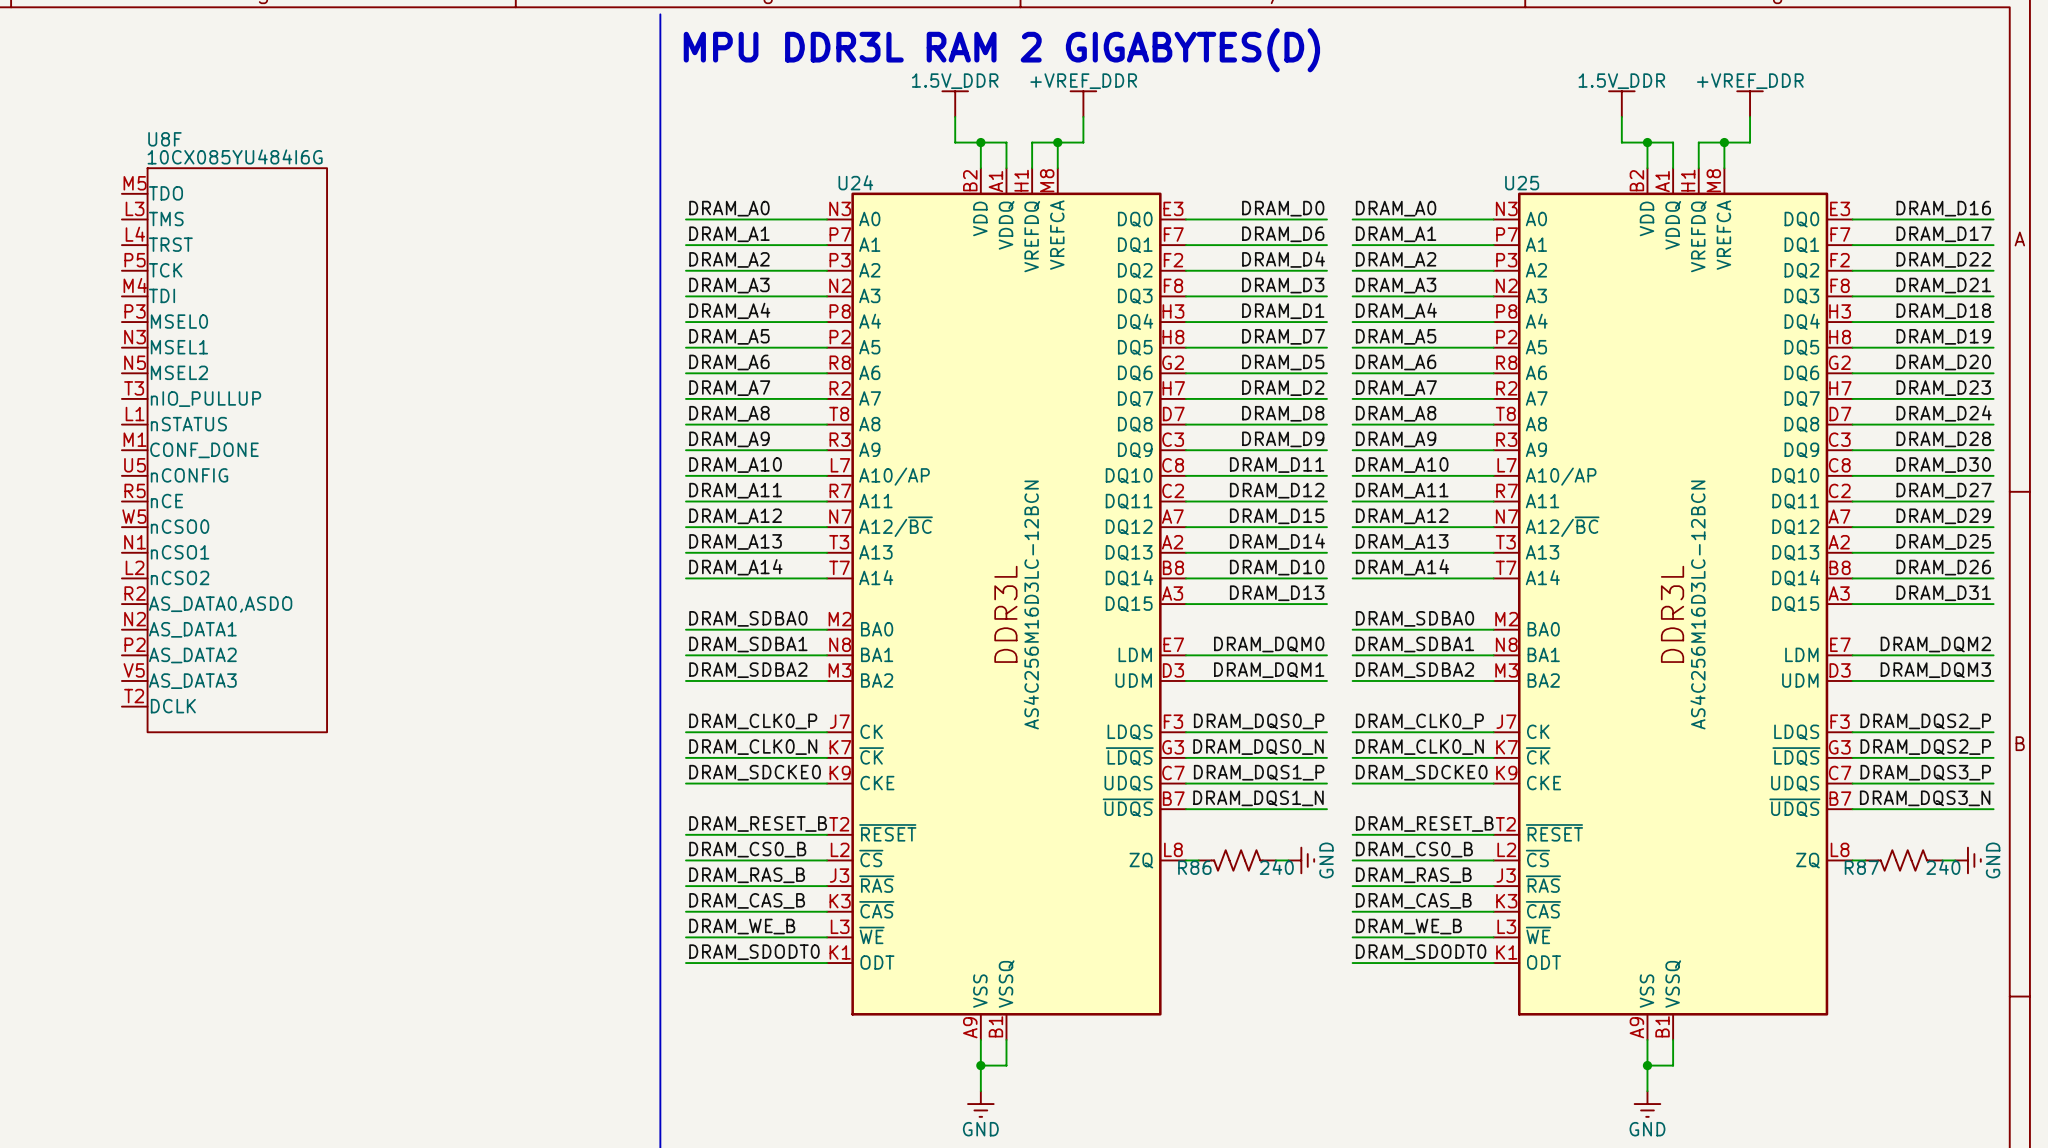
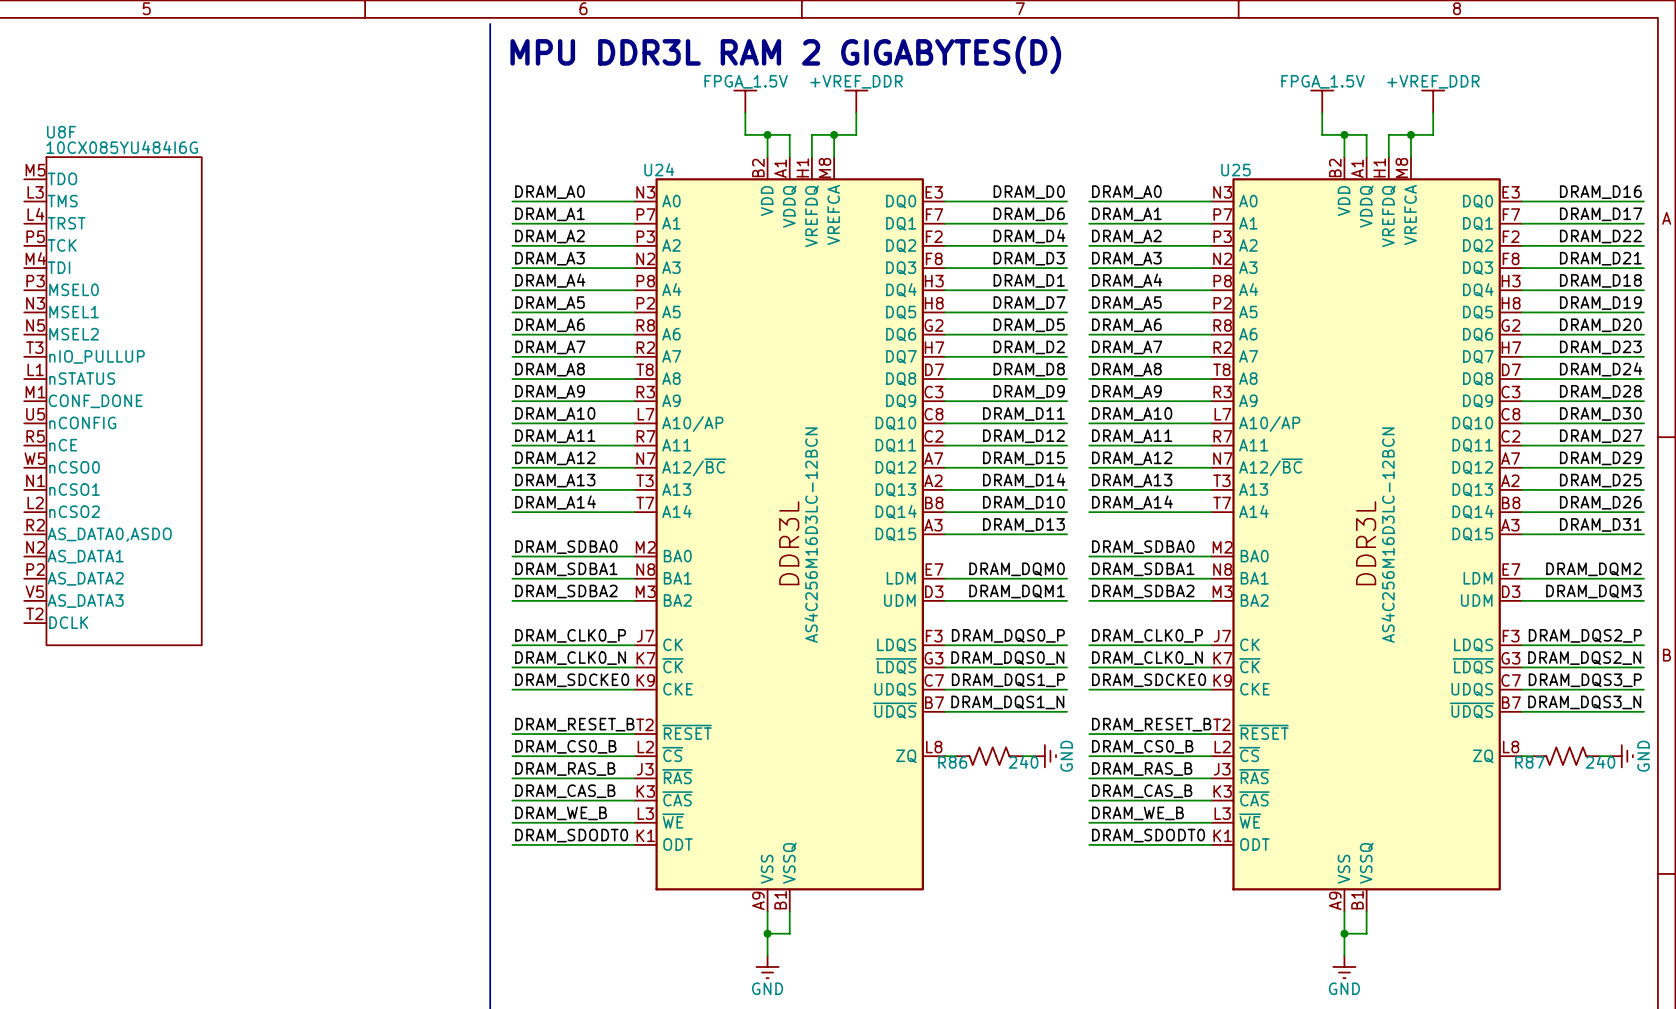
power symbol: 1.5V_DDR (955, 103) -> FPGA_1.5V (745, 101)
power symbol: 1.5V_DDR (1621, 103) -> FPGA_1.5V (1322, 101)
label: DRAM_DQS2_P (1925, 747) -> DRAM_DQS2_N (1584, 658)

